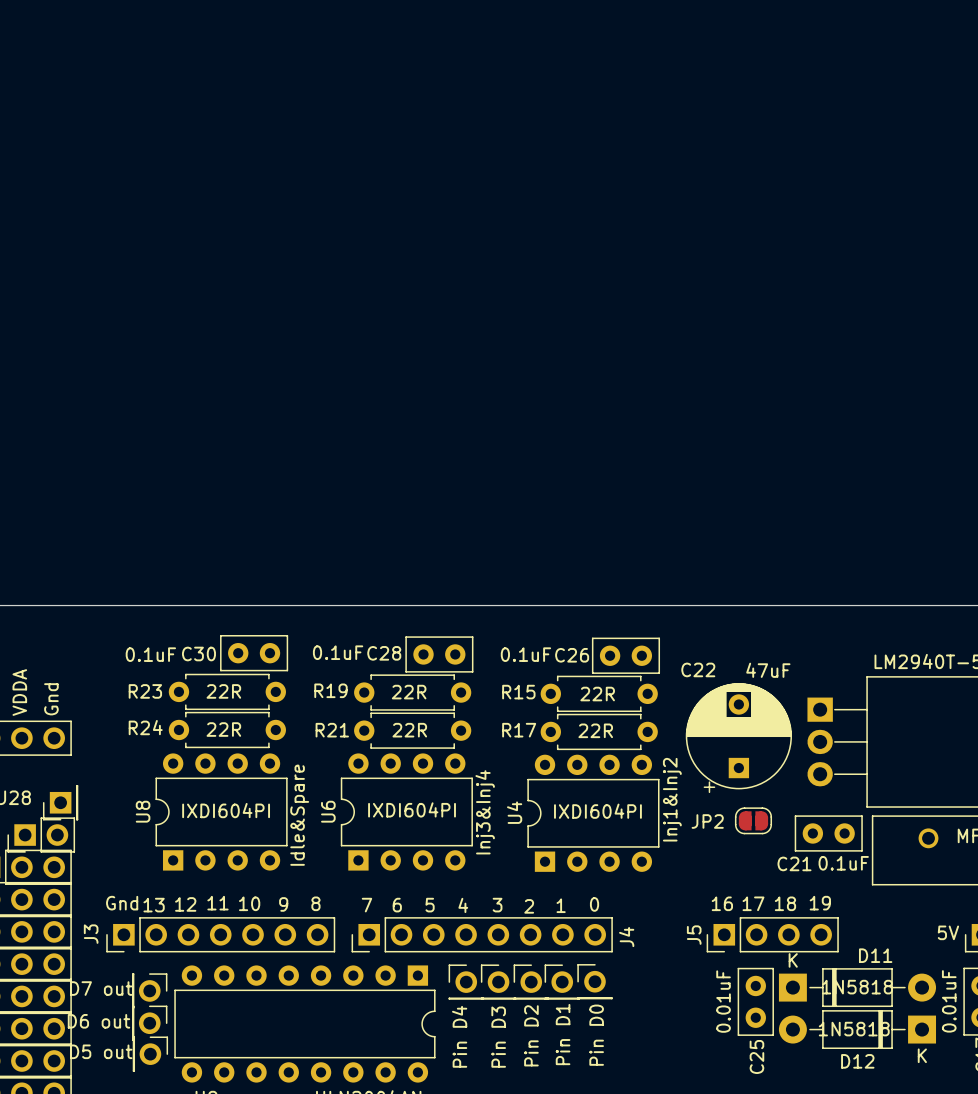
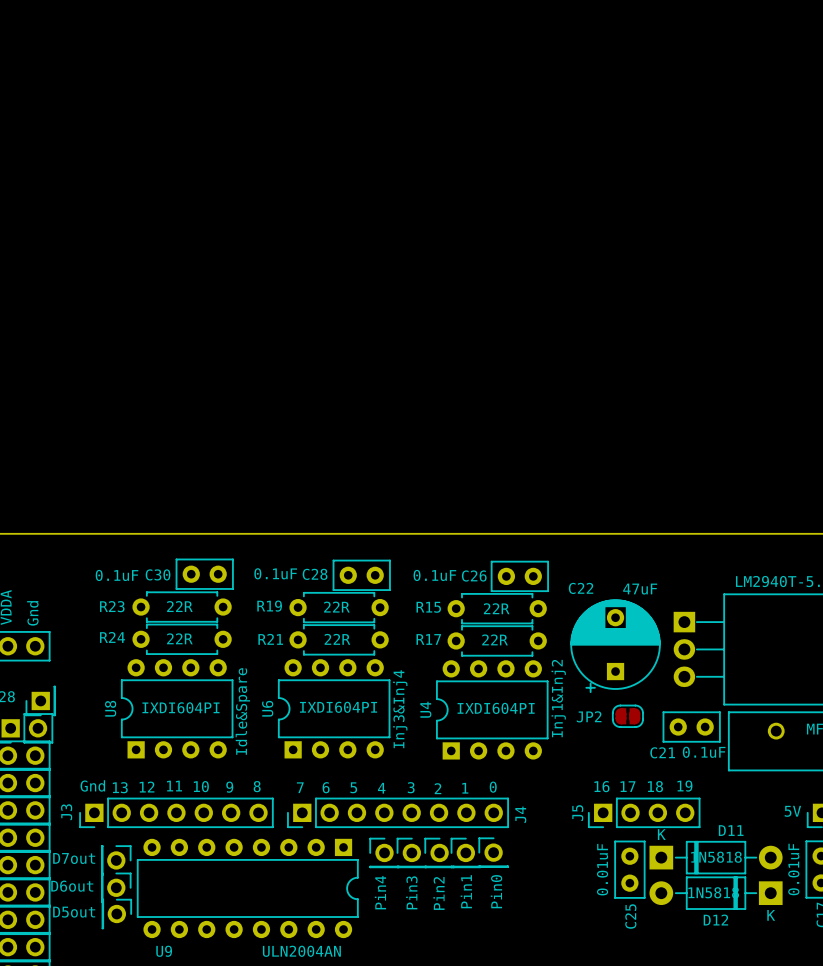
part value: D7 out (101, 988) -> D7out (74, 858)
part value: D6 out (98, 1021) -> D6out (72, 886)
part value: Pin D1 (563, 1034) -> Pin1 (466, 891)
part value: Pin D2 (531, 1035) -> Pin2 (438, 893)
part value: Pin D0 (596, 1035) -> Pin0 (496, 891)
part value: Pin D4 (459, 1036) -> Pin4 (380, 892)
part value: Pin D3 (498, 1037) -> Pin3 (411, 892)
part value: D5 out (101, 1051) -> D5out (74, 912)

